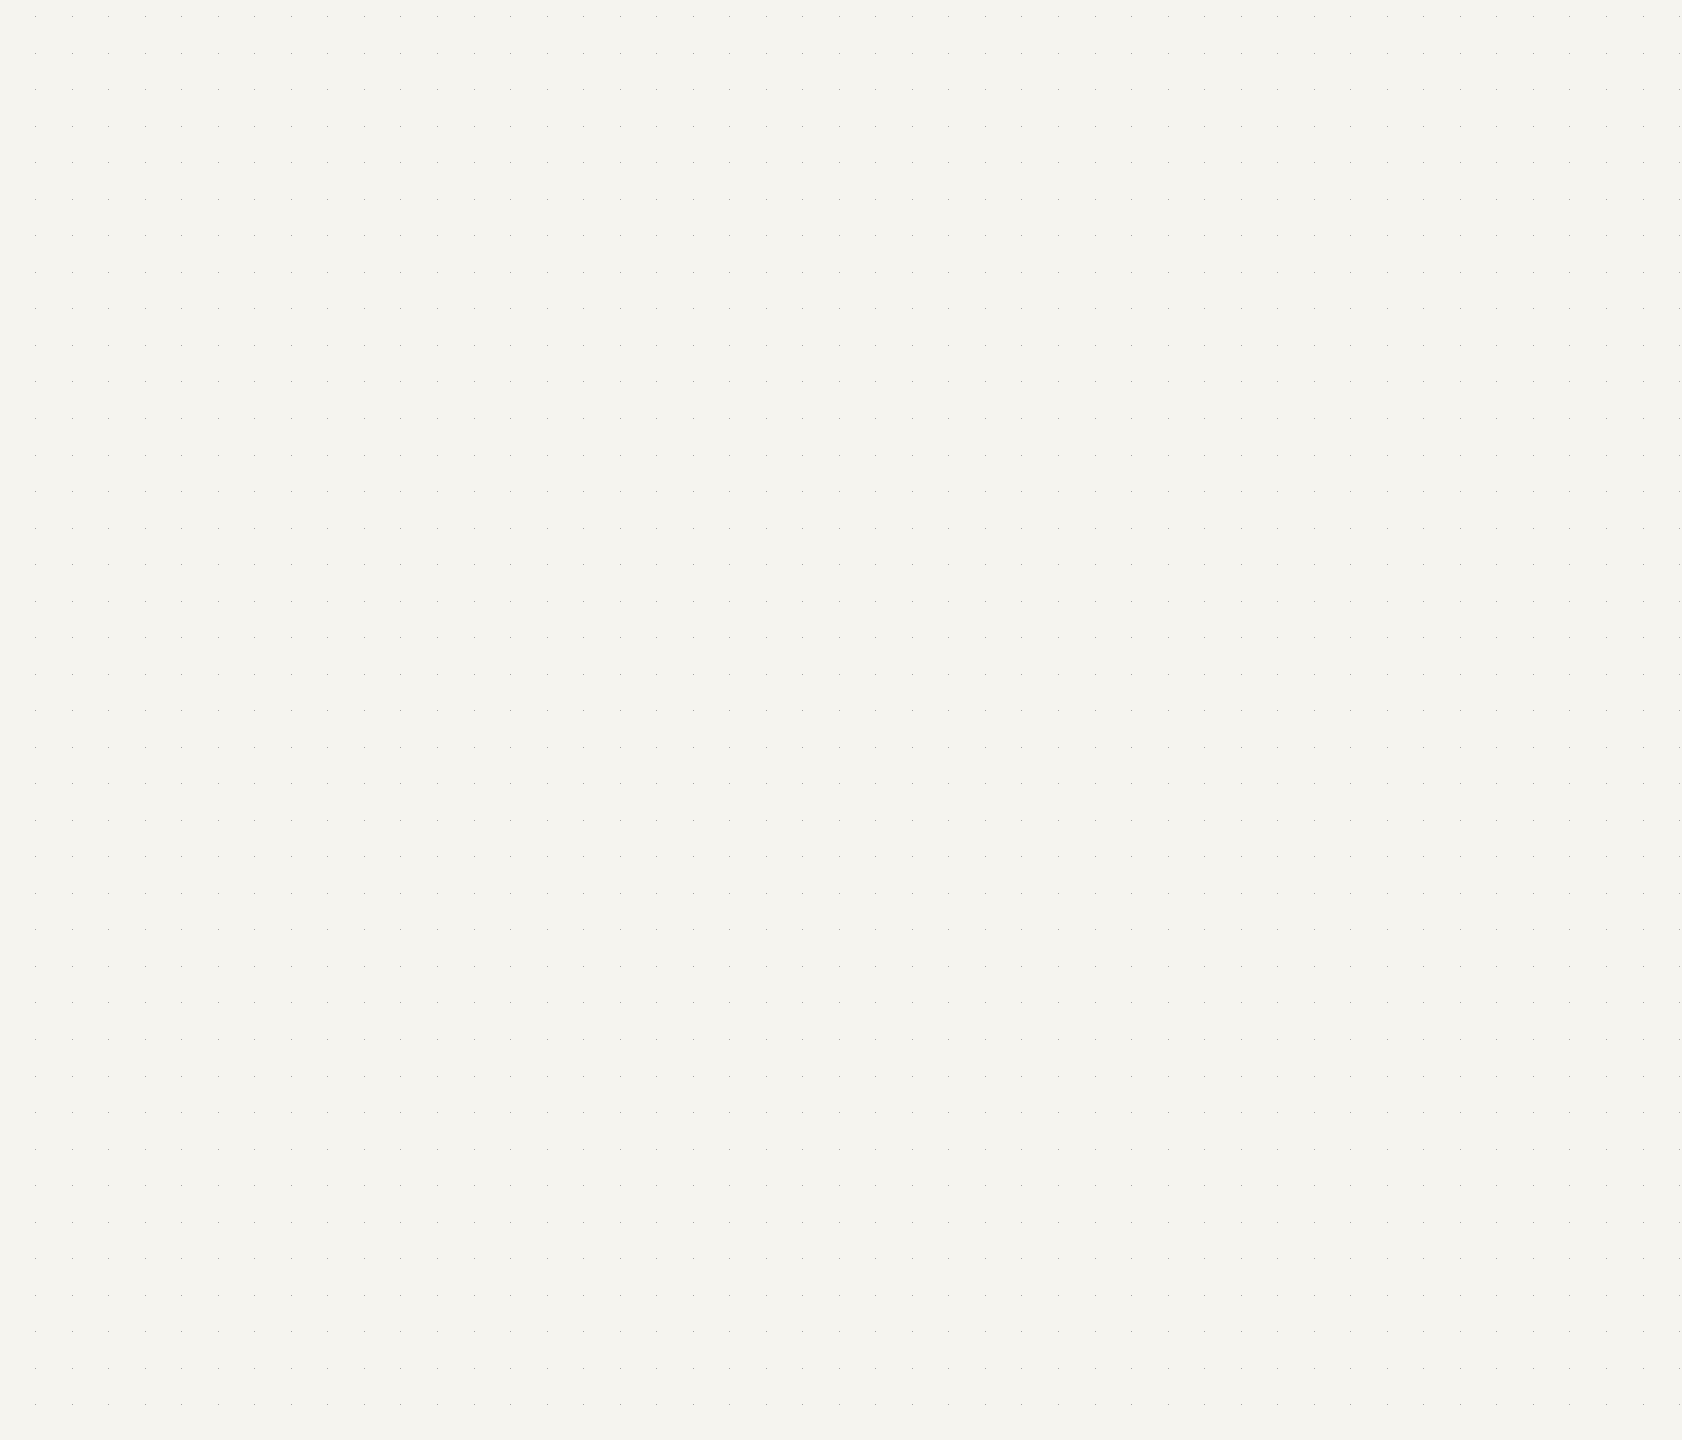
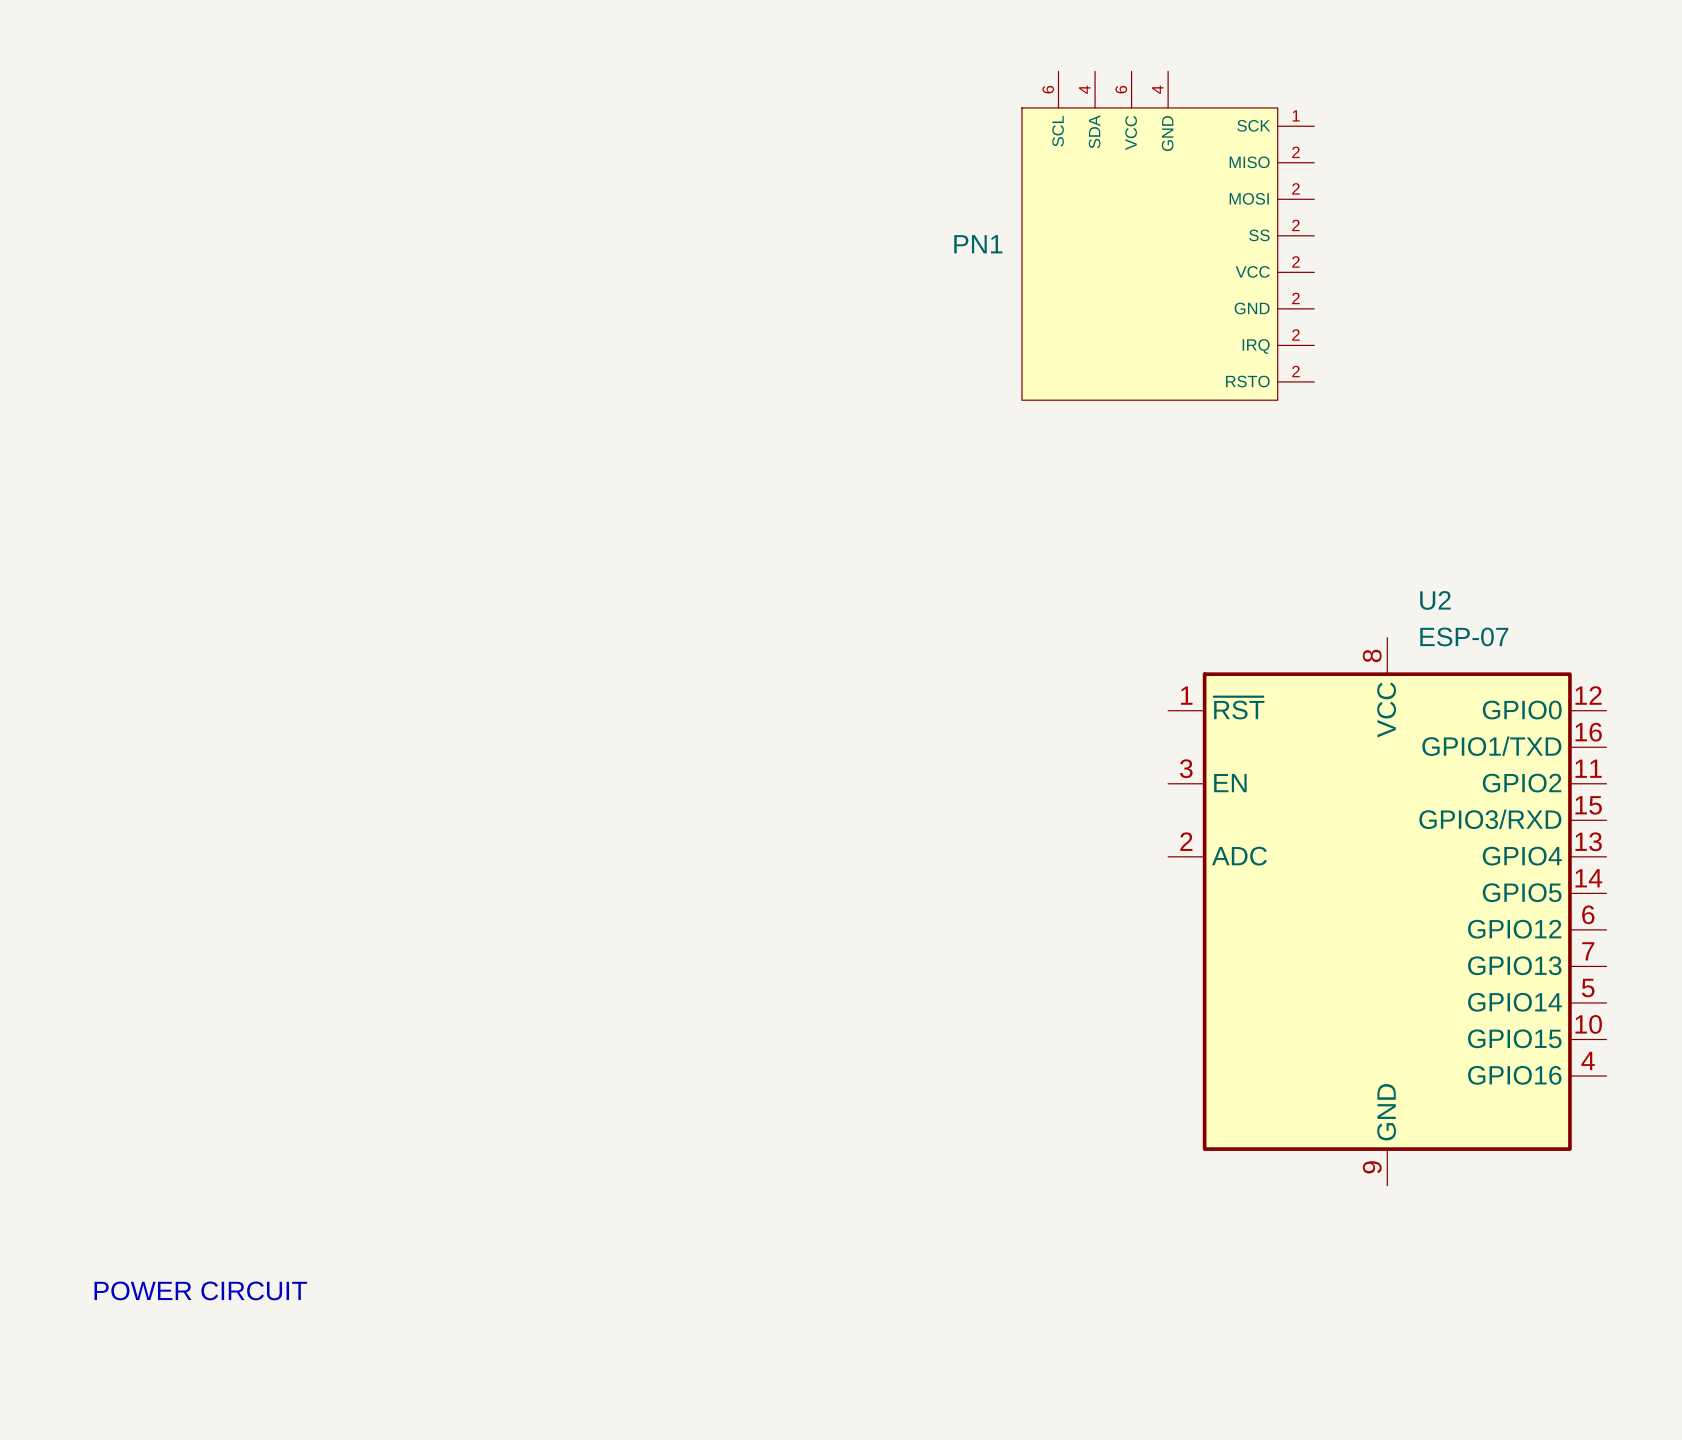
PN1: none -> (1168, 235)
U2: none -> ESP-07 (1387, 911)
text: none -> POWER CIRCUIT (200, 1290)

